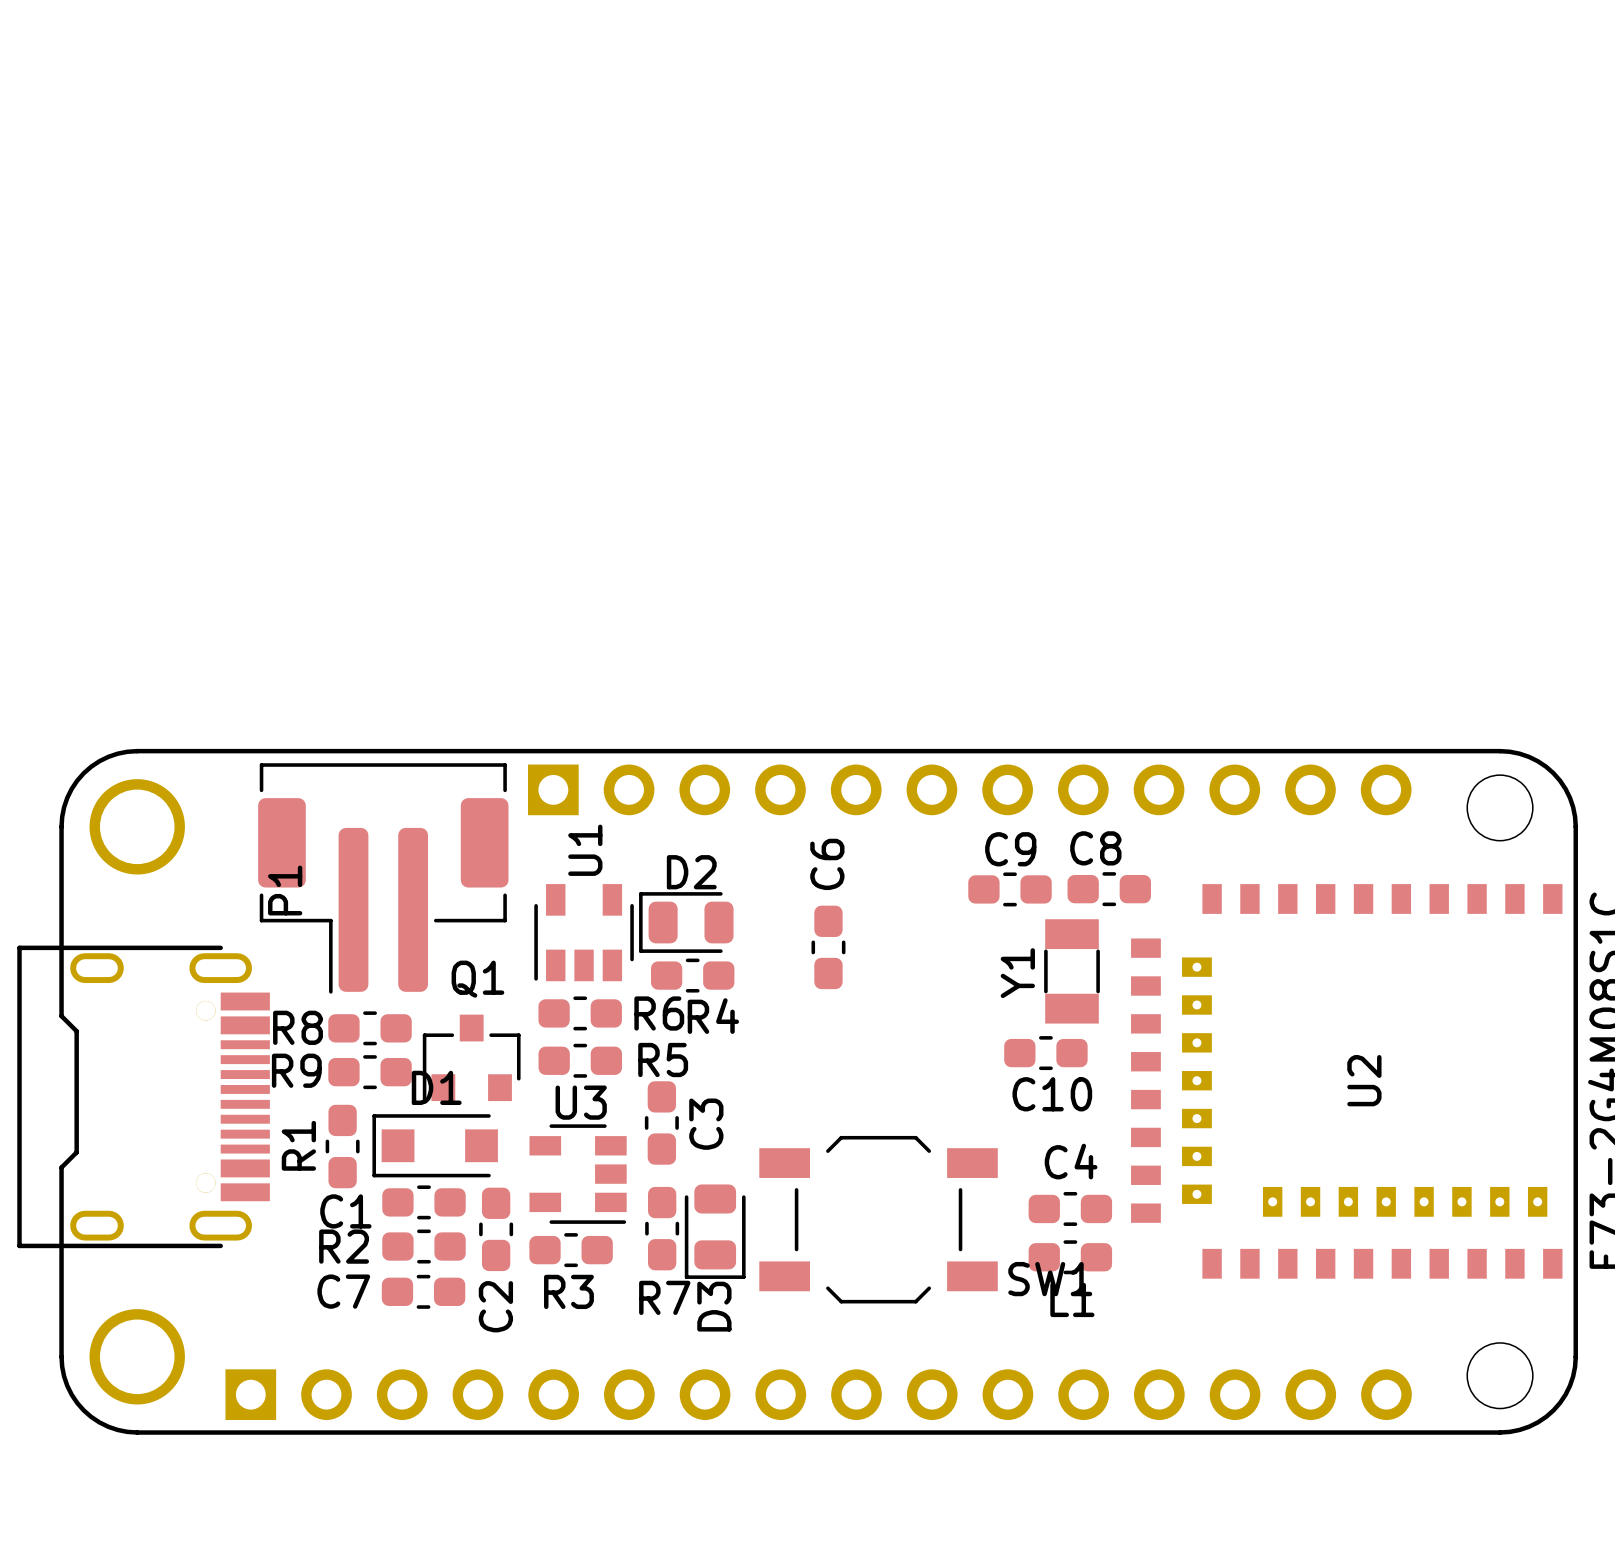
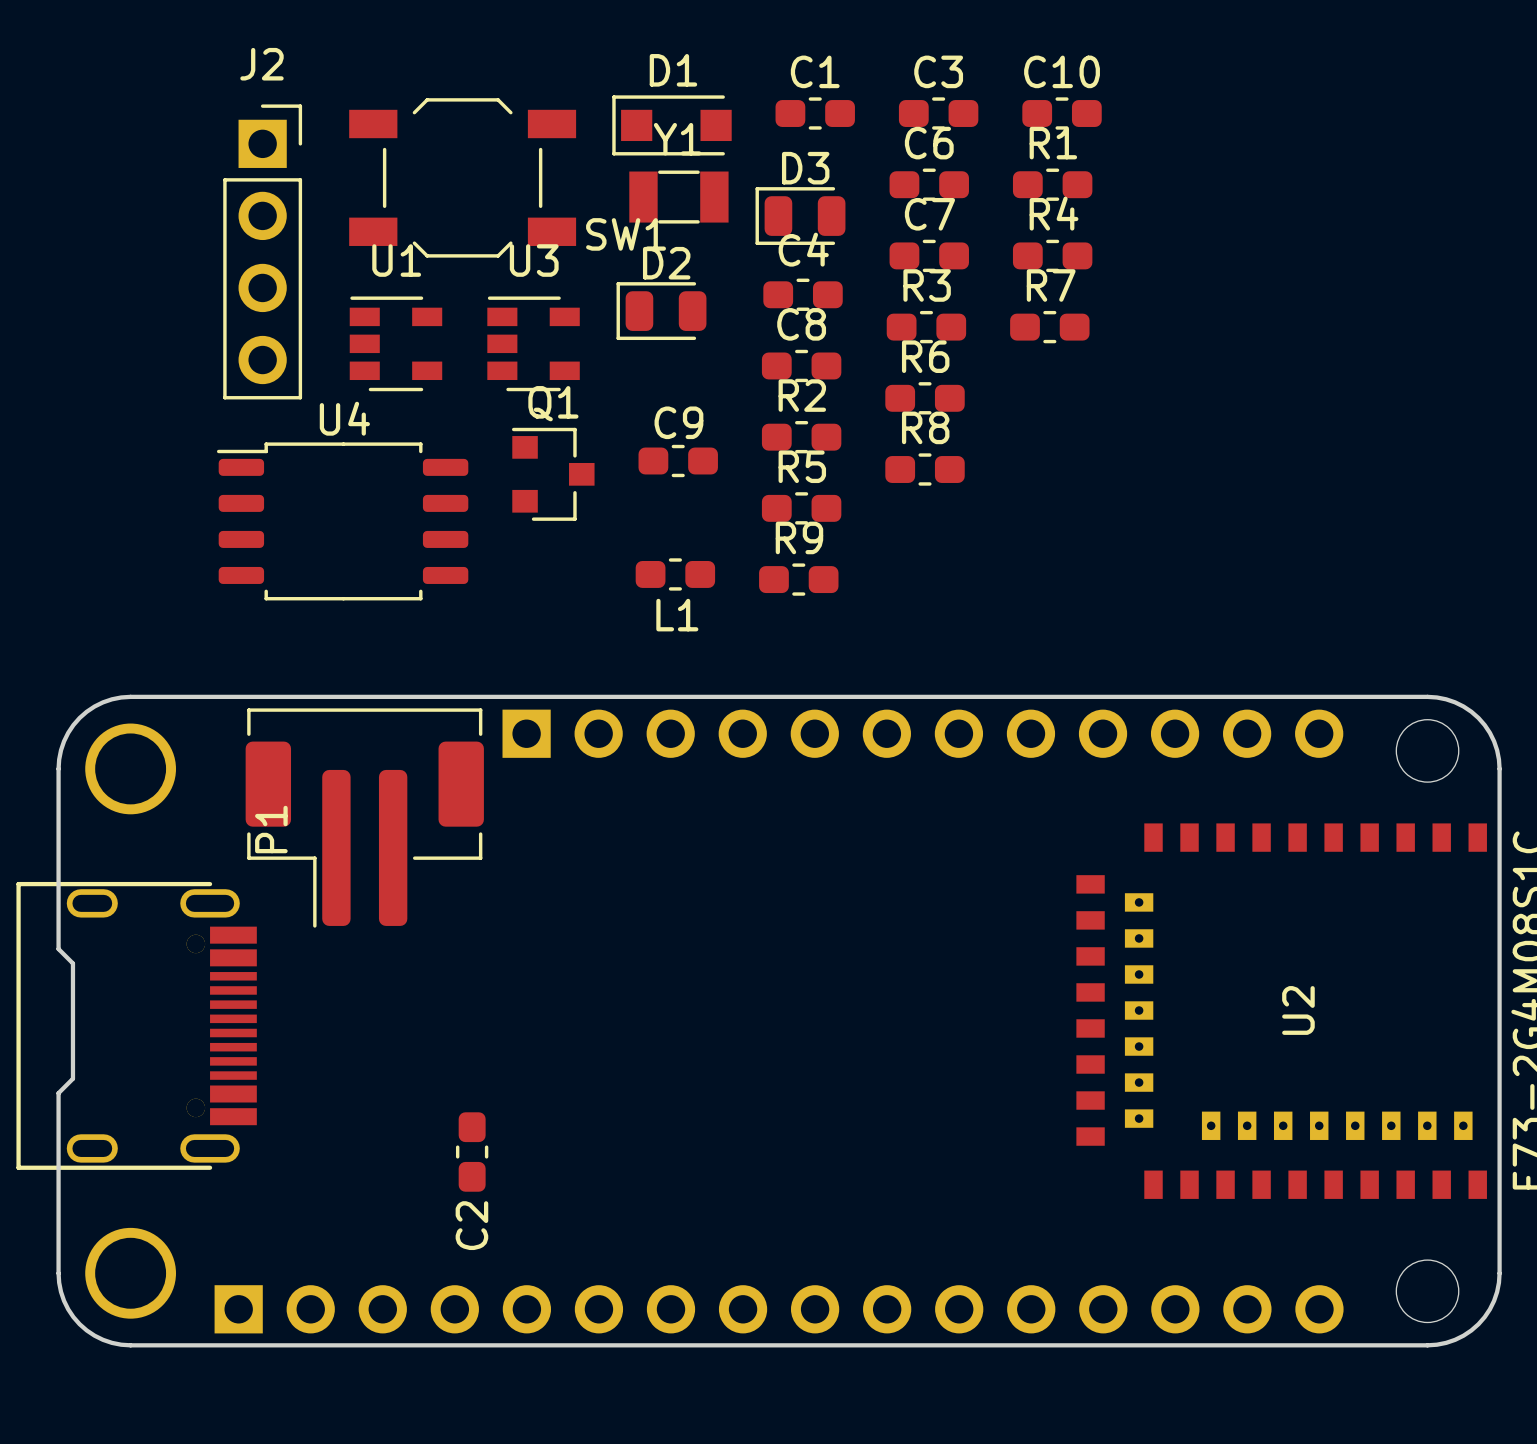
J2: none -> (262, 251)
U4: none -> (342, 521)
C8 name position: C8 (1095, 848) -> C8 (801, 324)
C9 position: (1010, 889) -> (678, 461)
C8 position: (1109, 889) -> (801, 365)
D2 position: (686, 922) -> (661, 311)
U1 rotation: 0° (584, 932) -> 90° clockwise (395, 343)
U1 position: (584, 932) -> (395, 343)
C6 rotation: 0° (828, 947) -> 90° clockwise (929, 184)
C6 position: (828, 947) -> (929, 184)
Y1 rotation: 0° (1072, 971) -> 90° clockwise (678, 197)
Y1 position: (1072, 971) -> (678, 197)
R4 position: (692, 975) -> (1052, 255)
R6 position: (580, 1013) -> (925, 398)
R6 name position: R6 (659, 1013) -> R6 (925, 356)
R4 name position: R4 (713, 1016) -> R4 (1054, 213)
R8 name position: R8 (298, 1027) -> R8 (925, 427)
R8 position: (370, 1028) -> (925, 469)
C10 position: (1045, 1053) -> (1062, 113)
Q1 rotation: 0° (471, 1057) -> 90° clockwise (553, 474)
Q1 position: (471, 1057) -> (553, 474)
R5 position: (580, 1060) -> (801, 508)
R5 name position: R5 (663, 1060) -> R5 (802, 466)
R9 name position: R9 (296, 1070) -> R9 (799, 537)
R9 position: (370, 1072) -> (798, 579)
C10 name position: C10 (1052, 1094) -> C10 (1062, 71)
C3 rotation: 0° (661, 1122) -> 90° clockwise (938, 113)
C3 position: (661, 1122) -> (938, 113)
C3 name position: C3 (706, 1124) -> C3 (938, 71)
D1 position: (435, 1145) -> (671, 125)
R1 rotation: 0° (342, 1146) -> 90° clockwise (1052, 184)
R1 position: (342, 1146) -> (1052, 184)
U3 rotation: 0° (578, 1174) -> 180° (533, 343)
U3 position: (578, 1174) -> (533, 343)
C1 position: (423, 1202) -> (815, 113)
C4 position: (1070, 1208) -> (803, 294)
C1 name position: C1 (345, 1211) -> C1 (815, 71)
SW1 position: (878, 1219) -> (462, 177)
R7 rotation: 0° (662, 1228) -> 90° clockwise (1049, 327)
R7 position: (662, 1228) -> (1049, 327)
D3 rotation: 0° (715, 1231) -> 90° clockwise (800, 216)
D3 position: (715, 1231) -> (800, 216)
R2 name position: R2 (344, 1246) -> R2 (802, 395)
R2 position: (423, 1246) -> (801, 437)
R3 position: (571, 1250) -> (926, 327)
L1 position: (1070, 1257) -> (675, 574)
C7 name position: C7 (343, 1291) -> C7 (929, 214)
C7 position: (423, 1291) -> (929, 255)
R3 name position: R3 (568, 1291) -> R3 (927, 285)
R7 name position: R7 (664, 1297) -> R7 (1051, 285)
D3 name position: D3 (714, 1306) -> D3 (805, 168)

